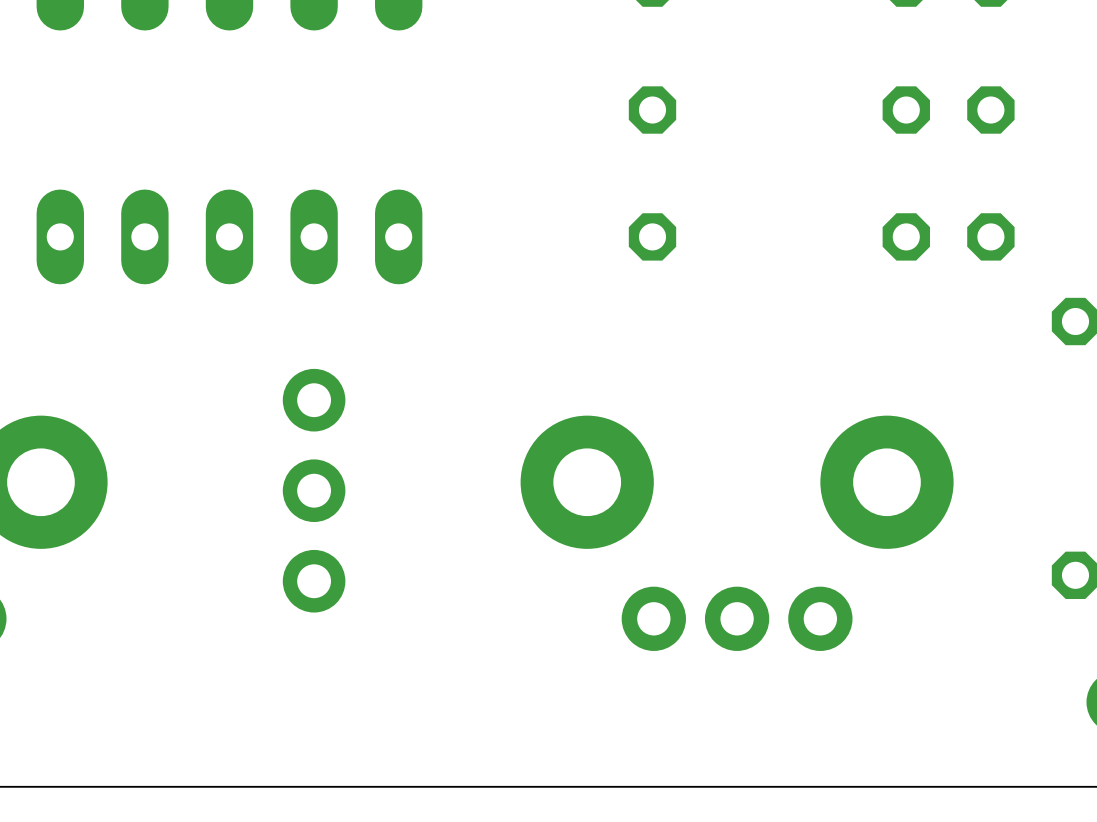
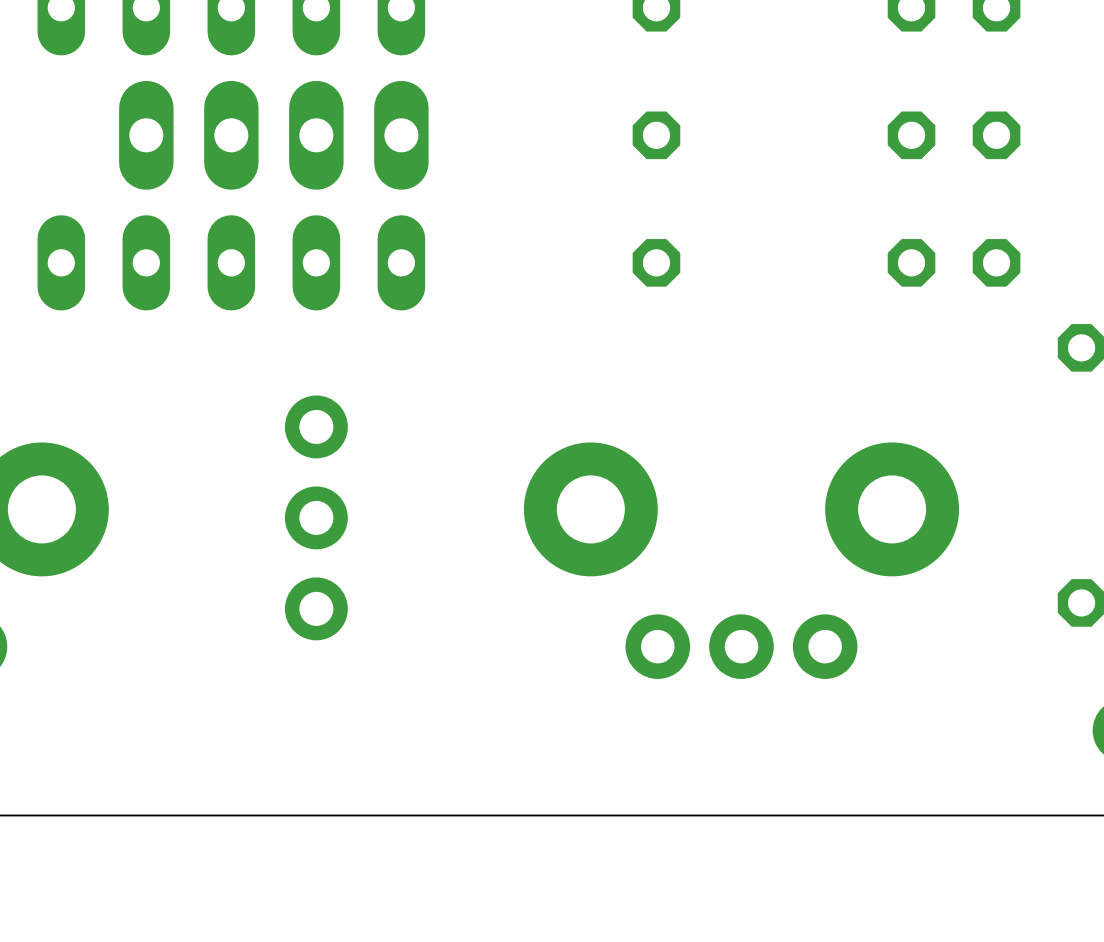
part: none -> (273, 135)

